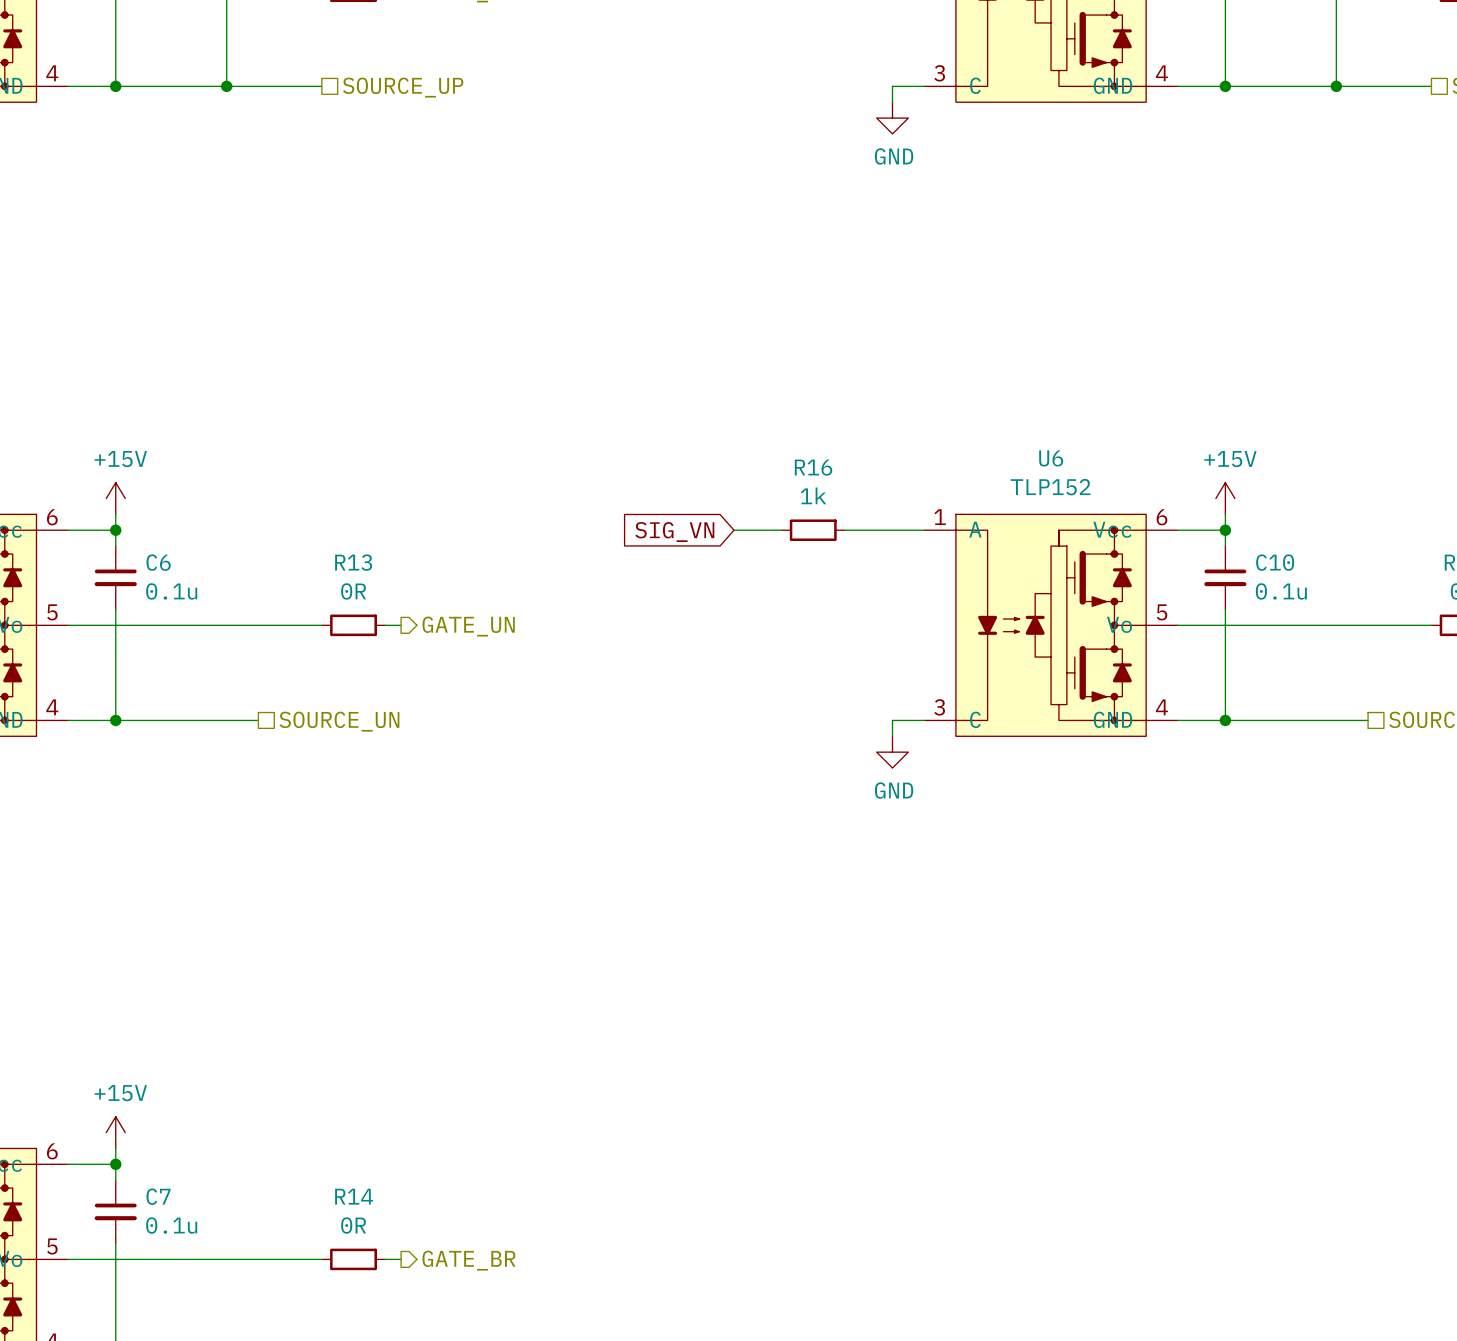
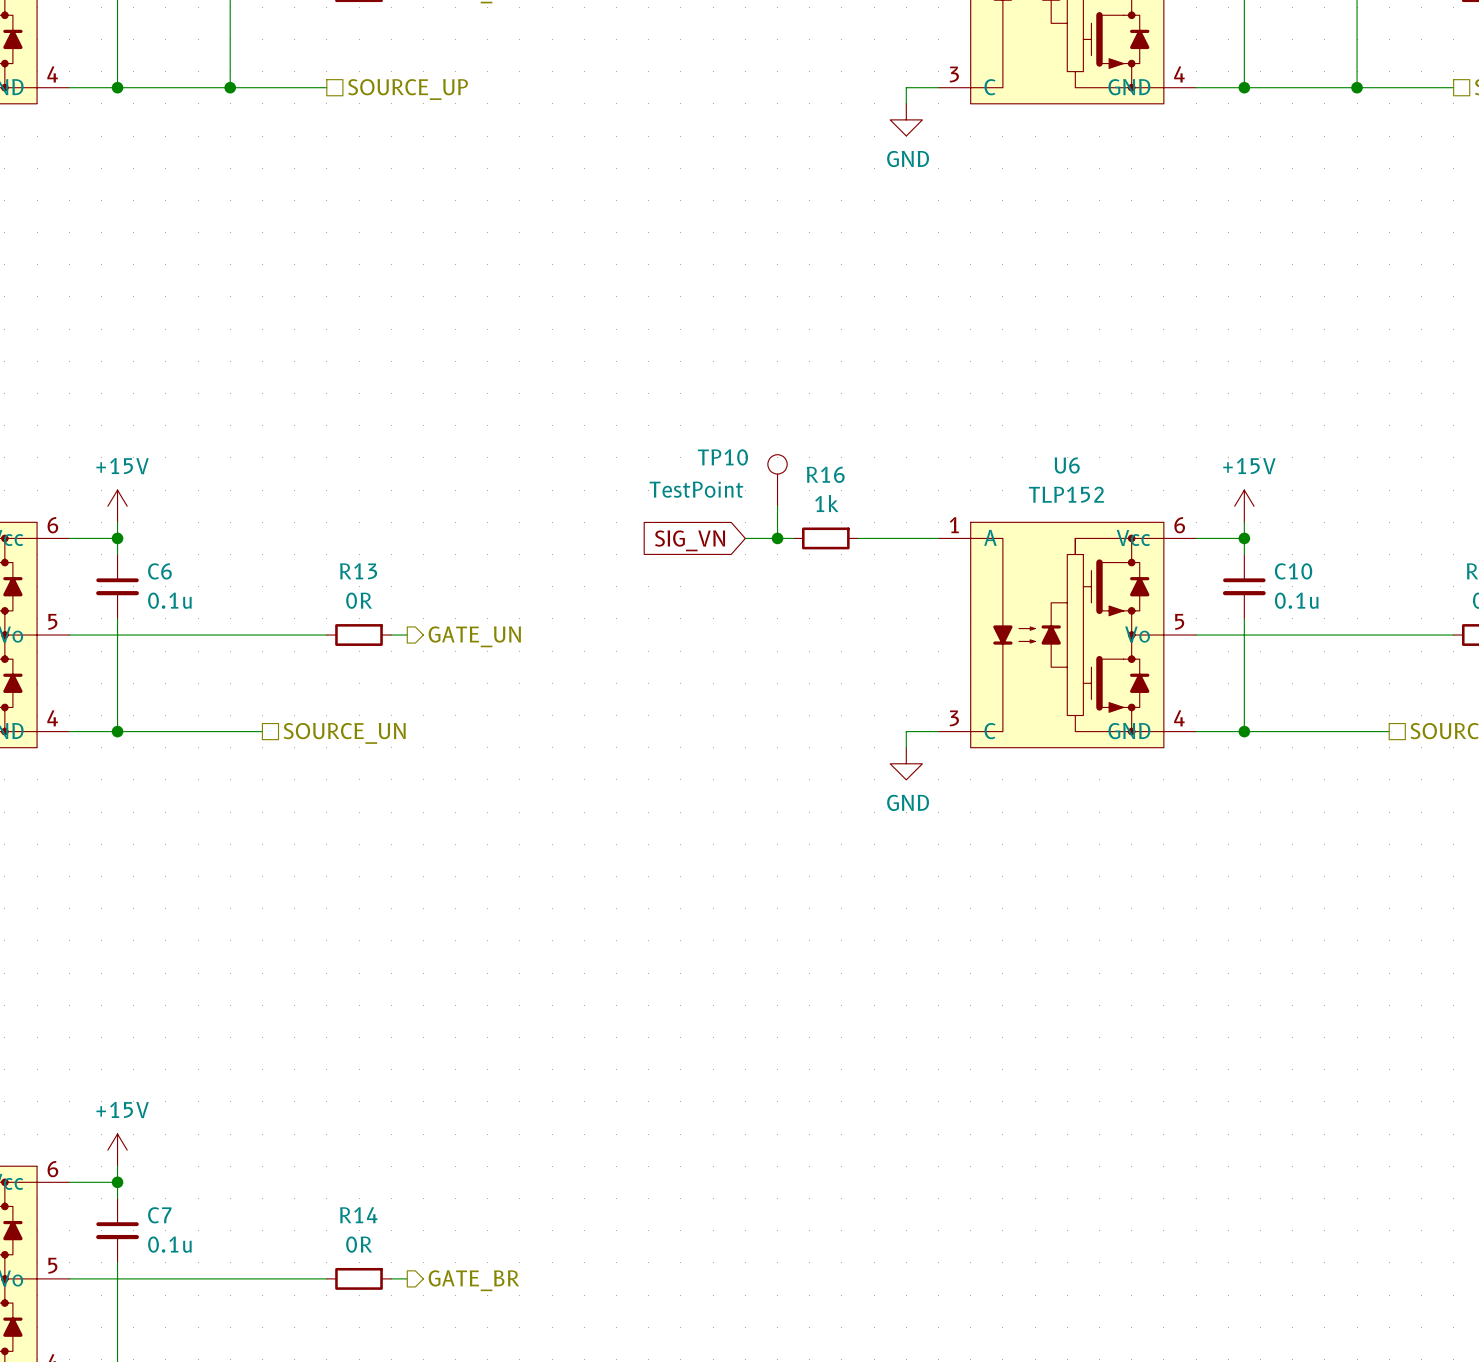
TP10: none -> TestPoint (777, 480)
wire: none -> (777, 506) (777, 538)
junction: none -> (777, 538)

